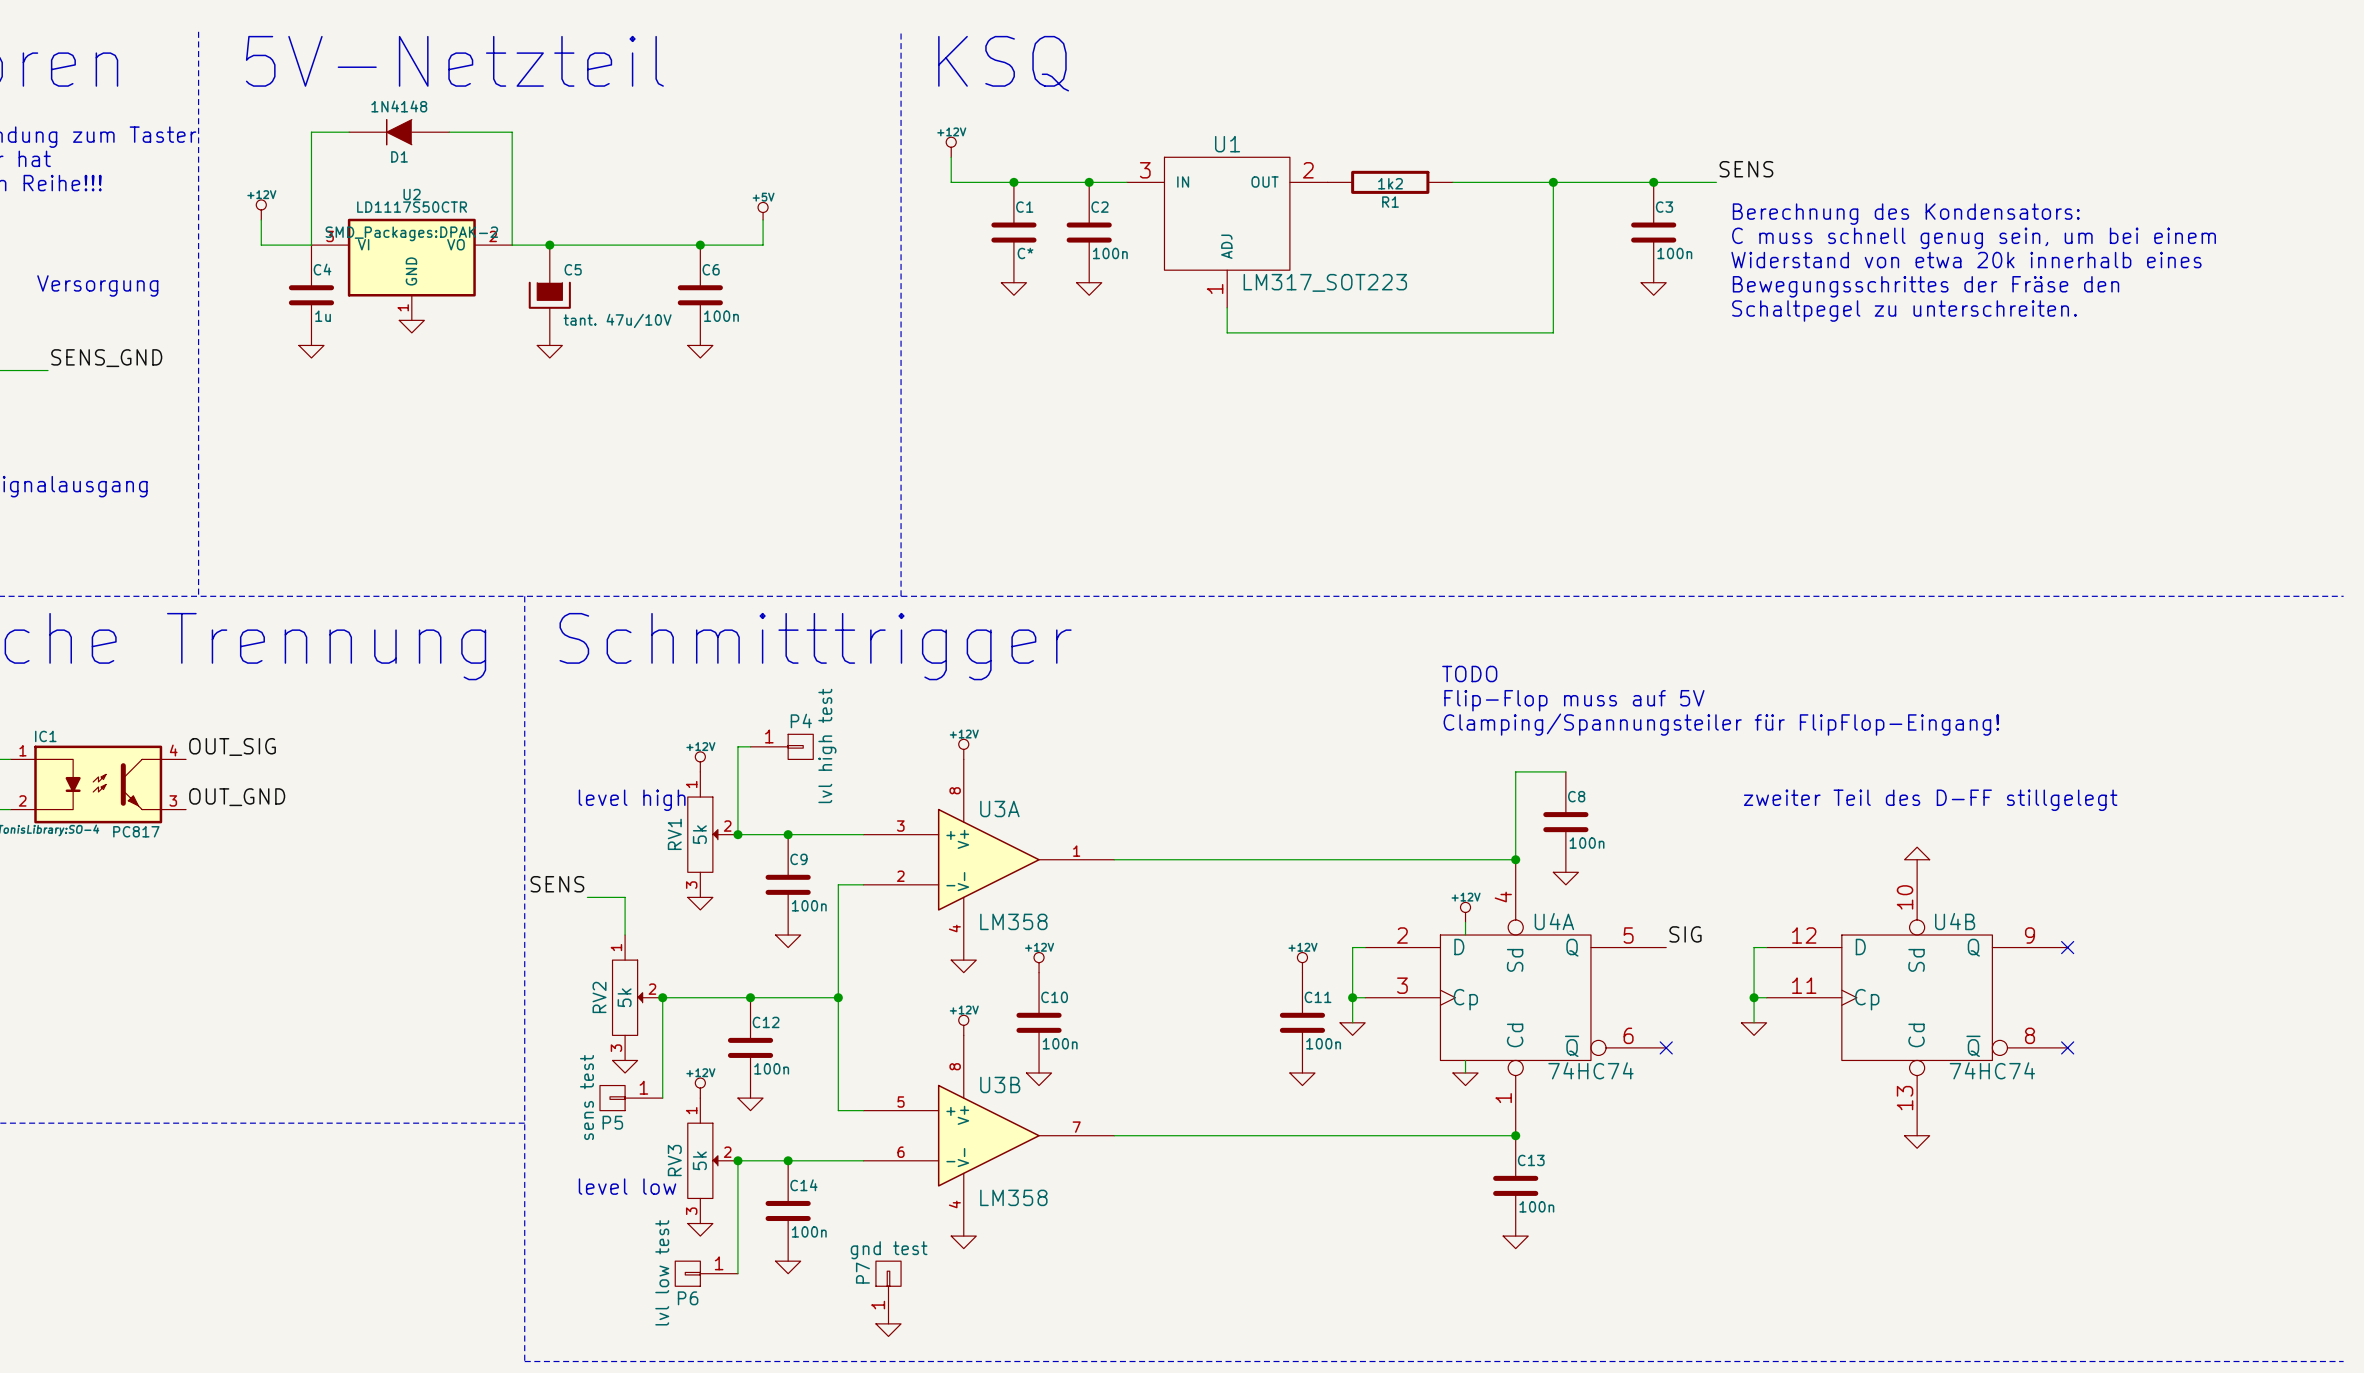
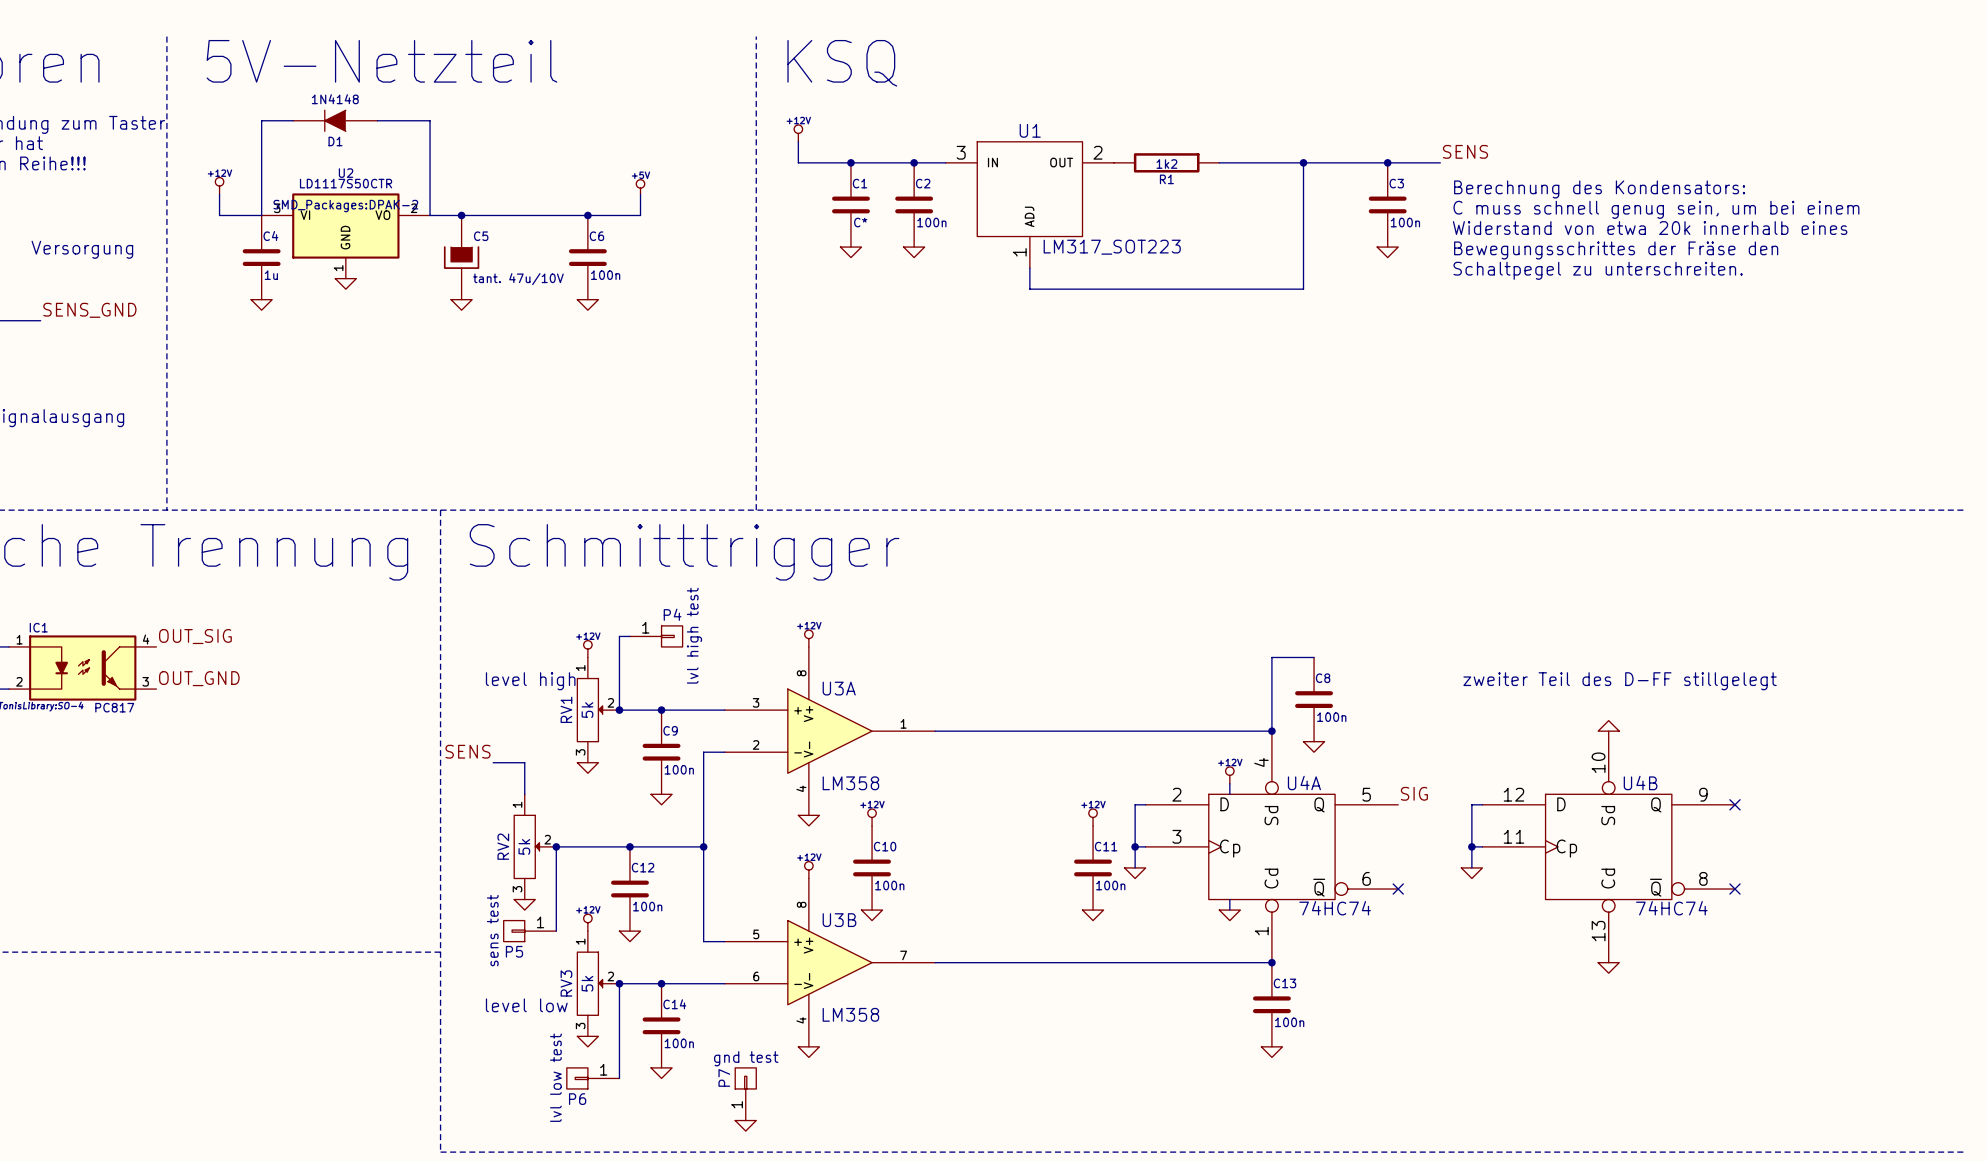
text: TODO (1469, 674) -> none
text: Flip-Flop muss auf 5V (1574, 700) -> none
text: Clamping/Spannungsteiler für FlipFlop-Eingang! (1721, 724) -> none

